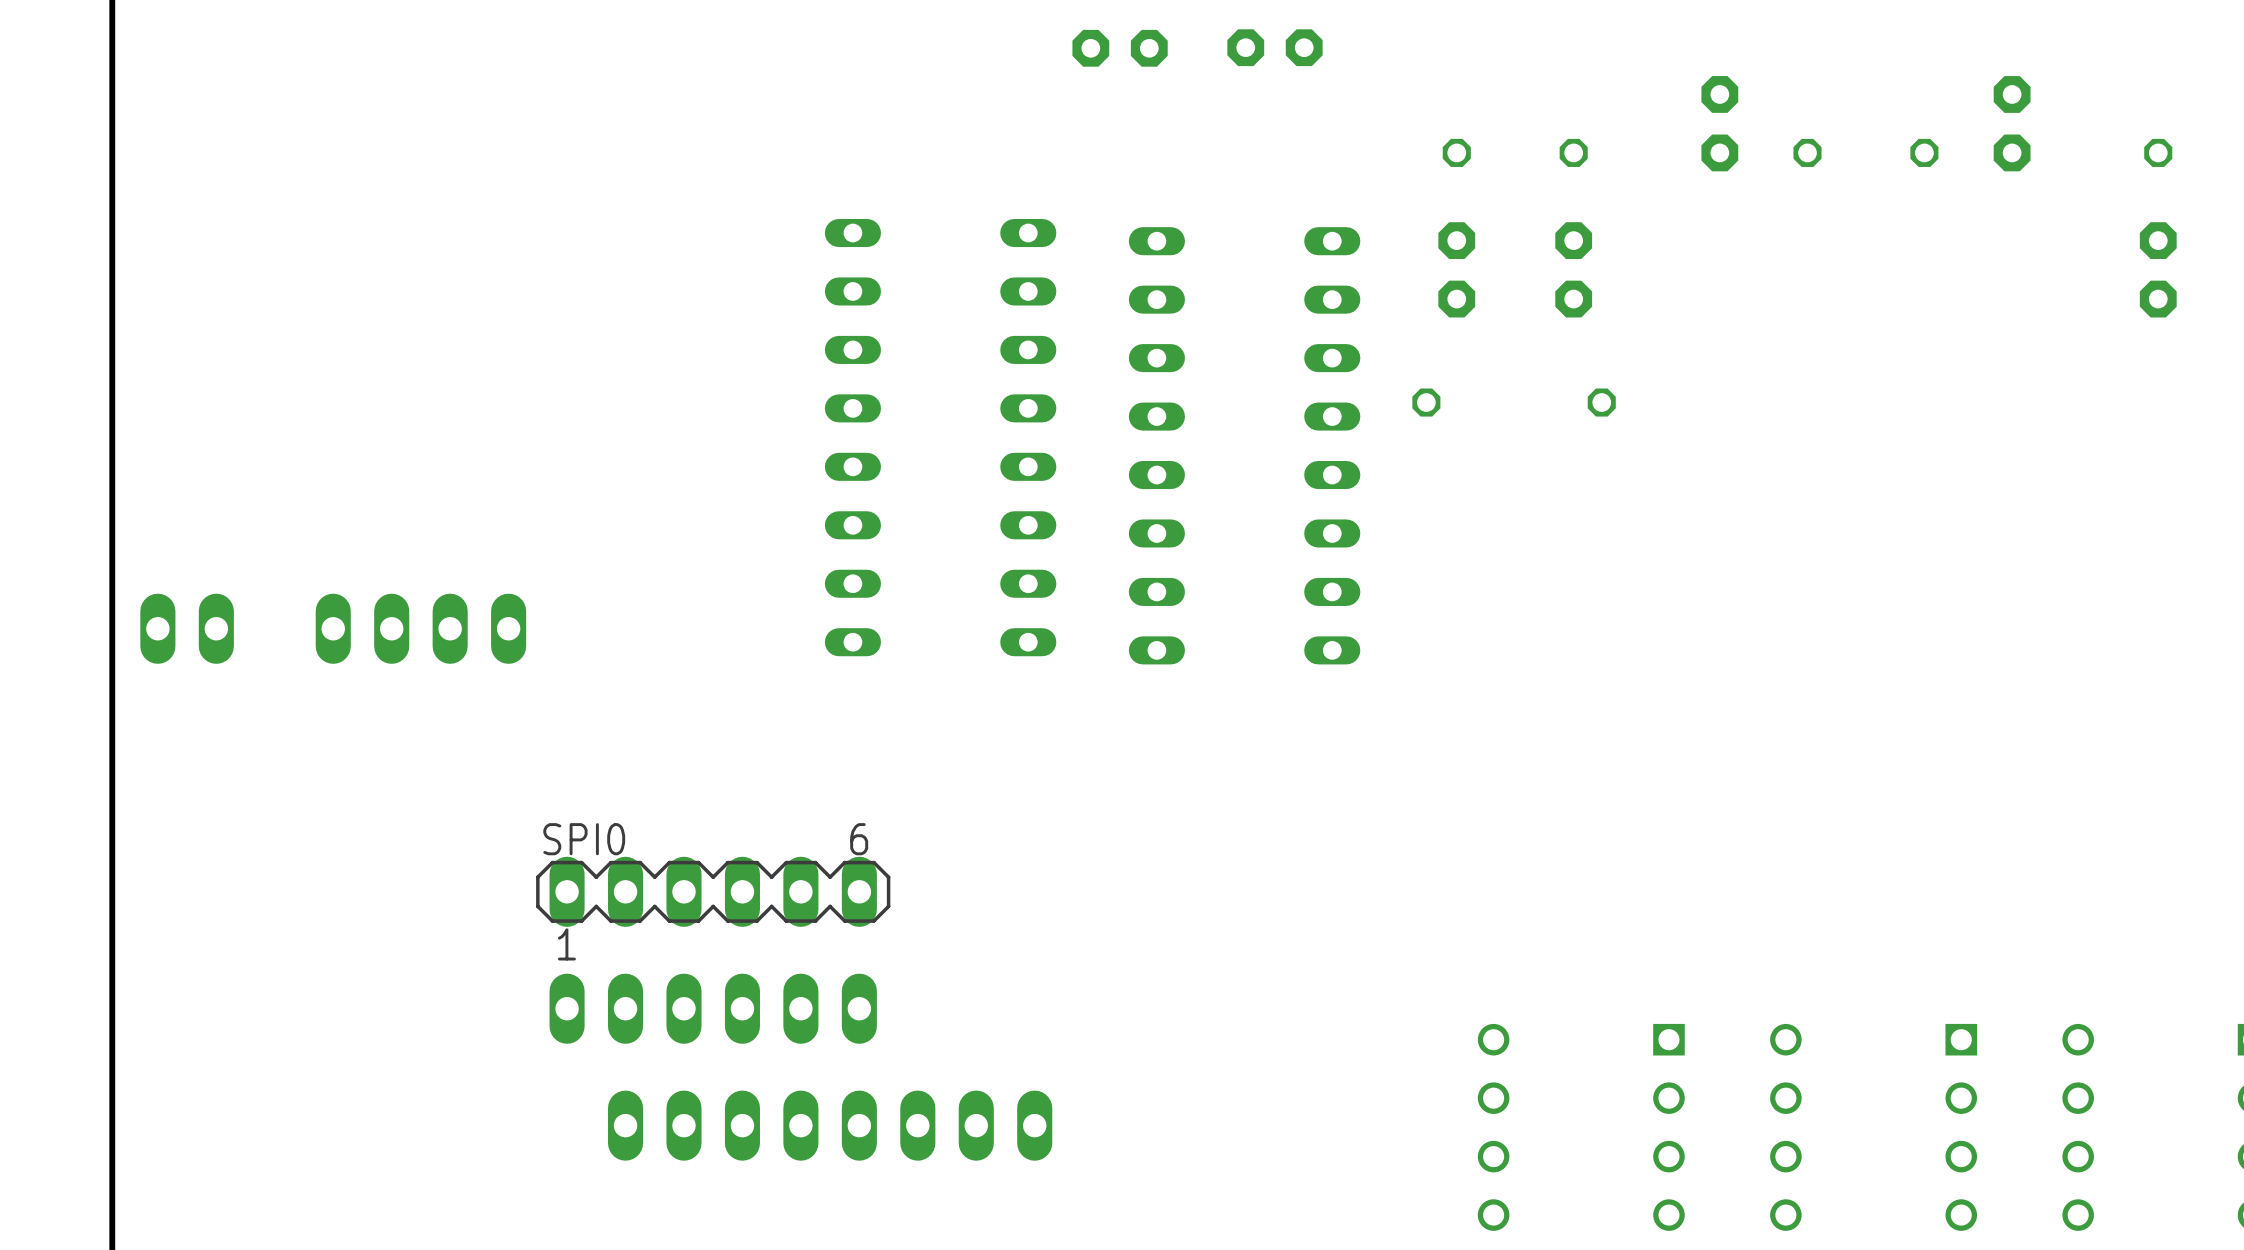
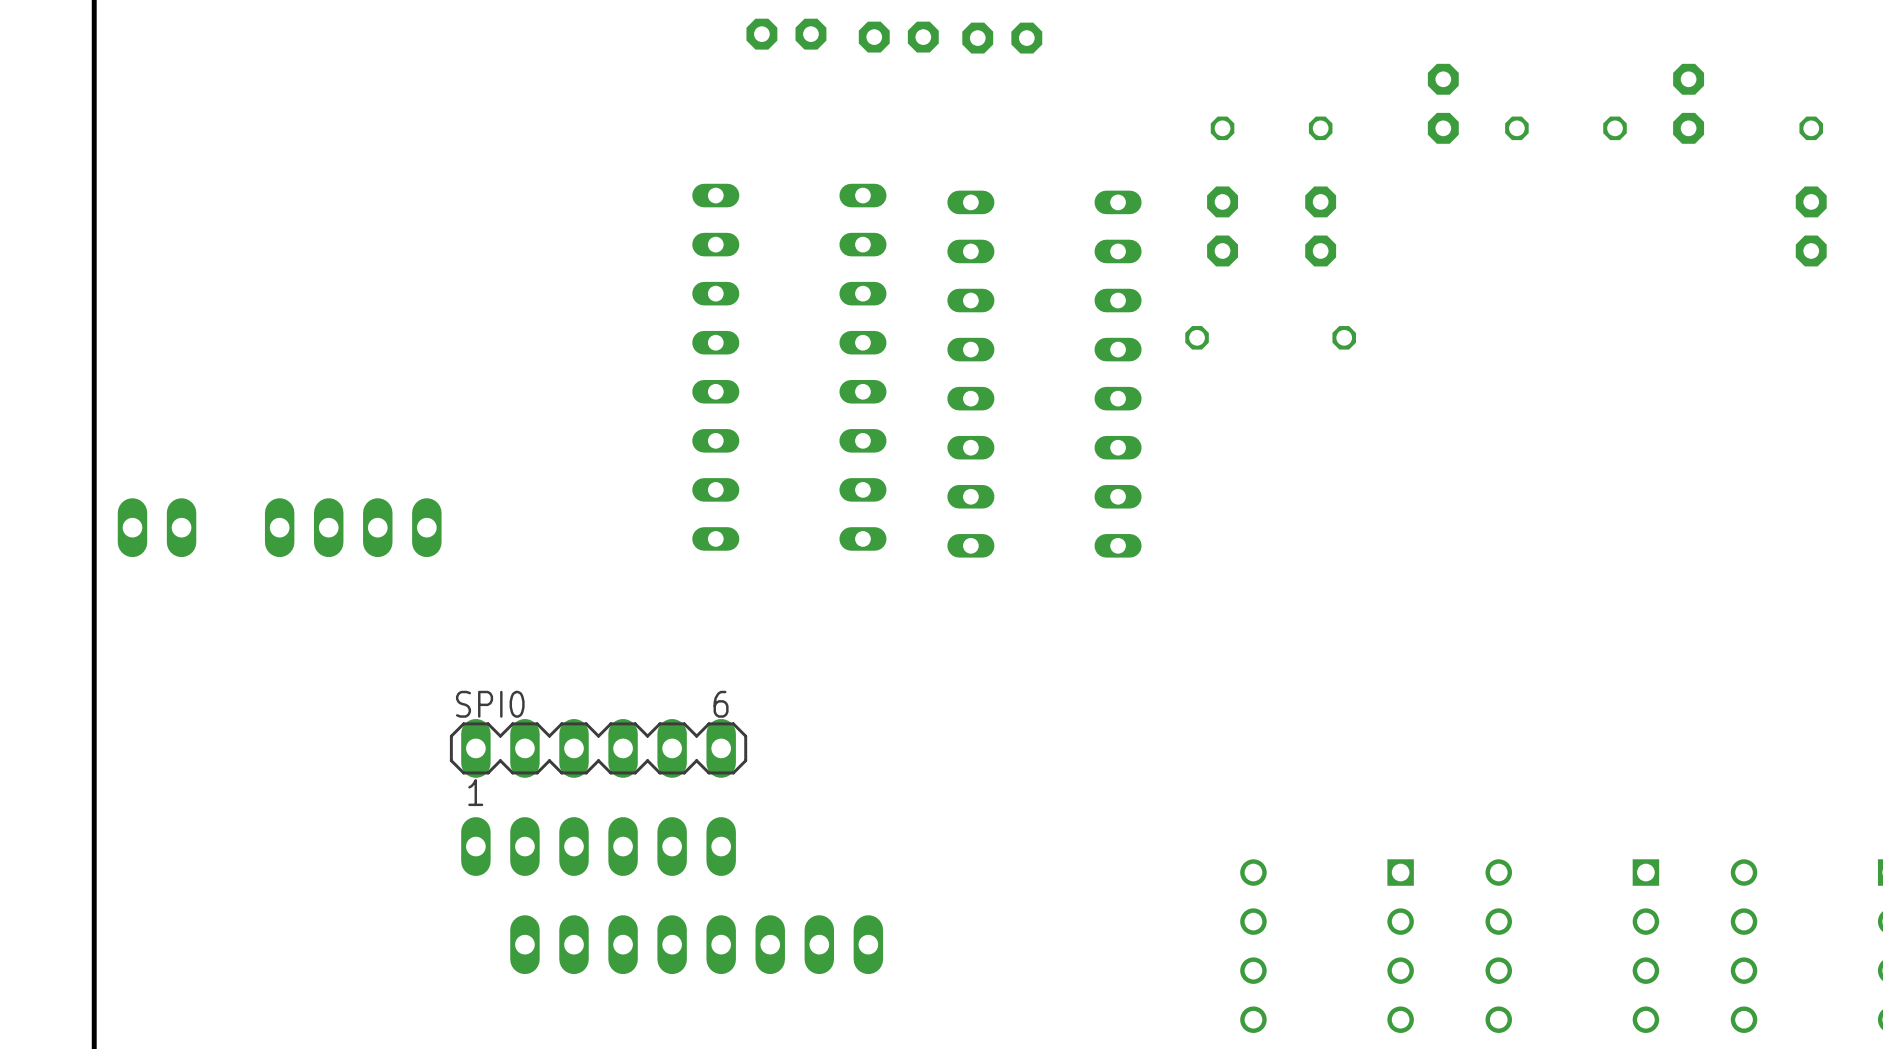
part: none -> (786, 34)
part: none -> (898, 37)
part: none -> (1002, 38)
part: (1274, 47) -> none
part: (1120, 48) -> none

